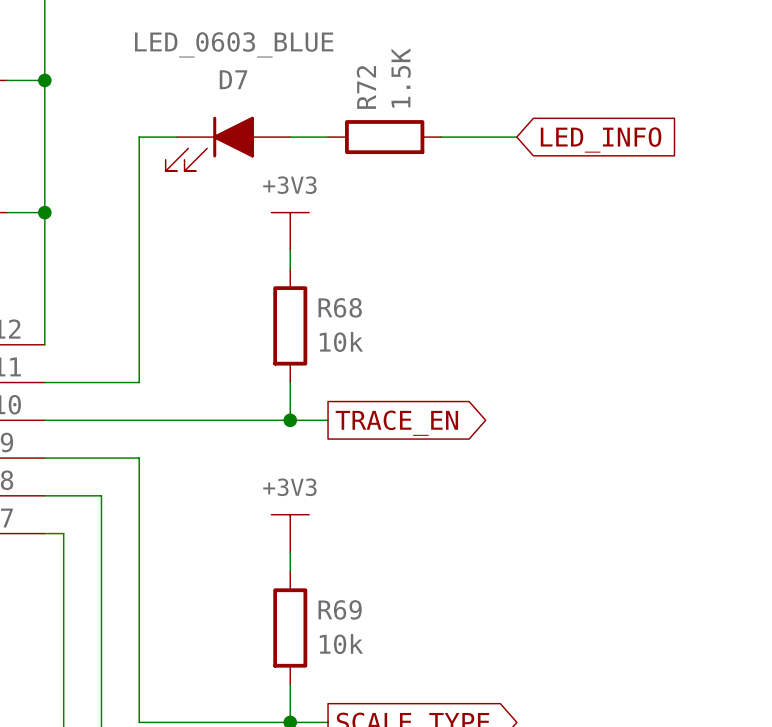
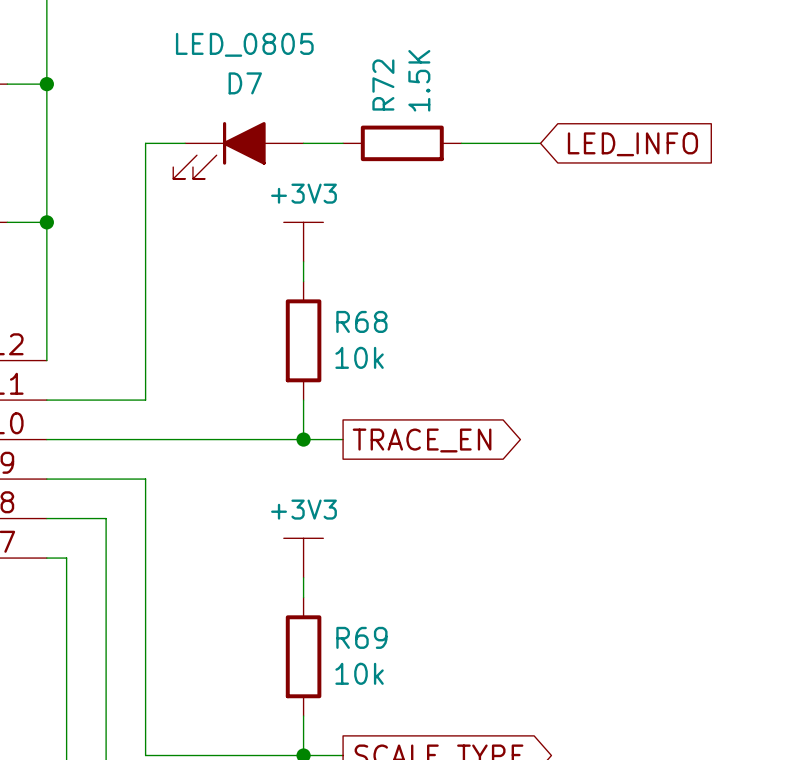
D7 value: LED_0603_BLUE (234, 44) -> LED_0805 (244, 44)

